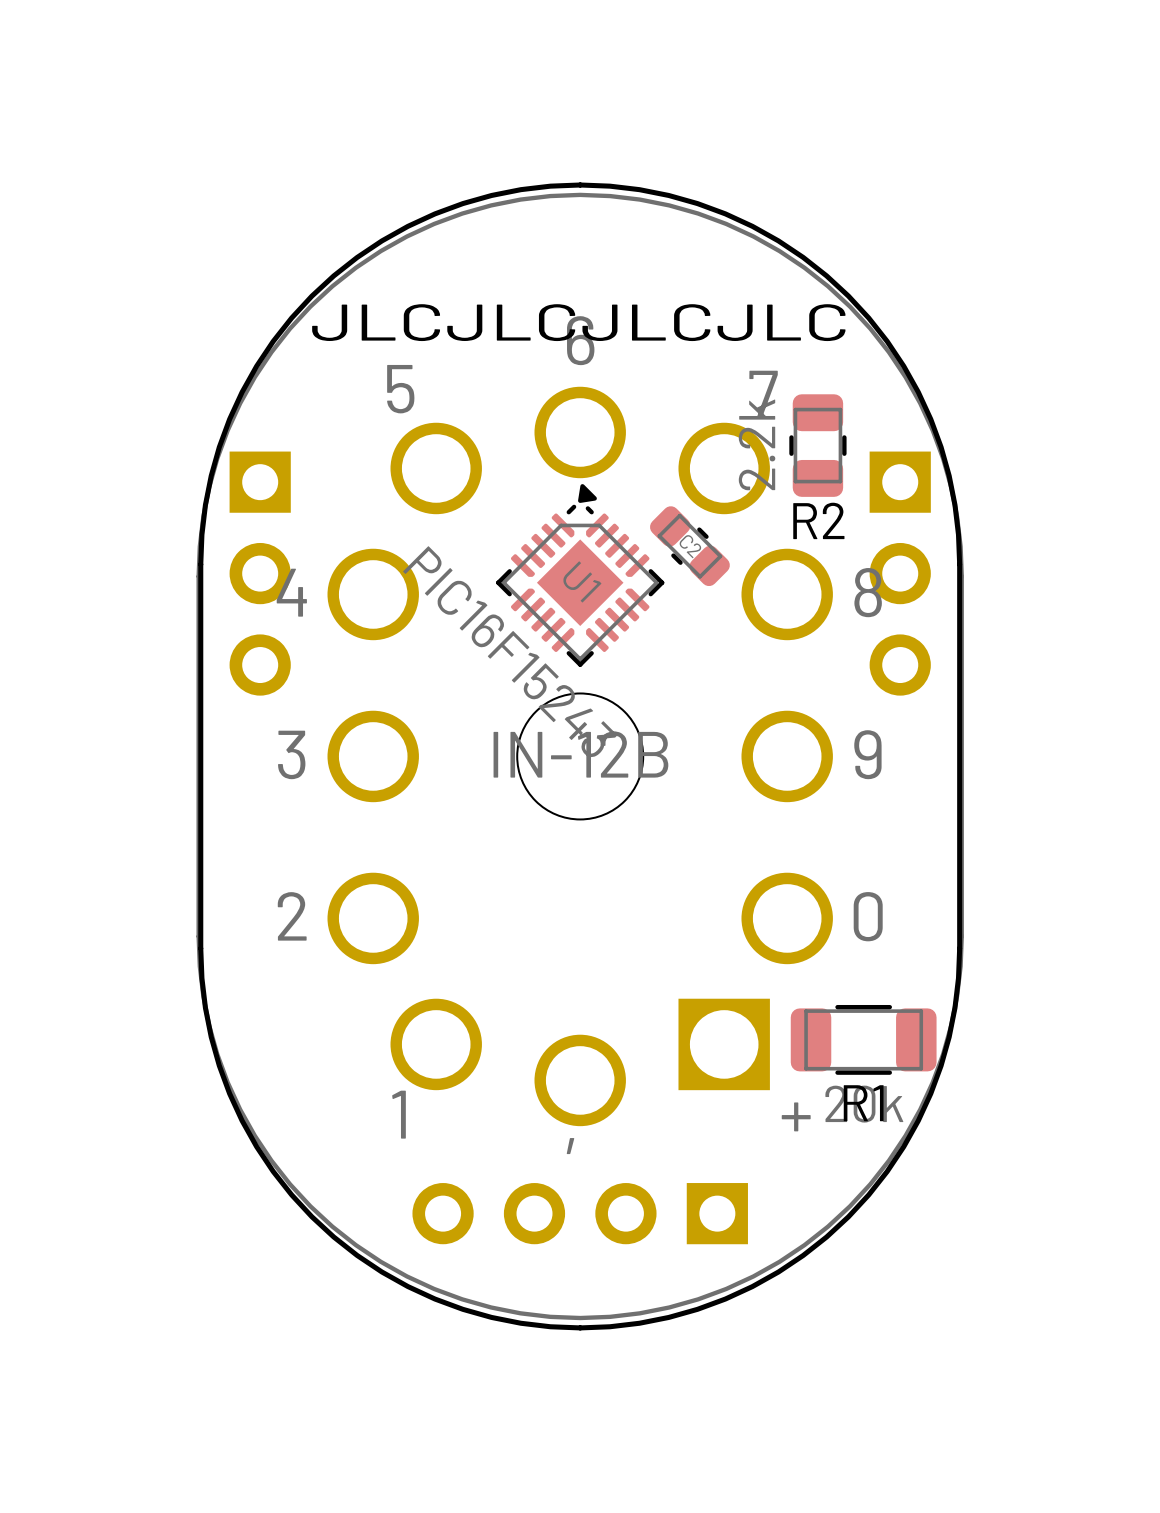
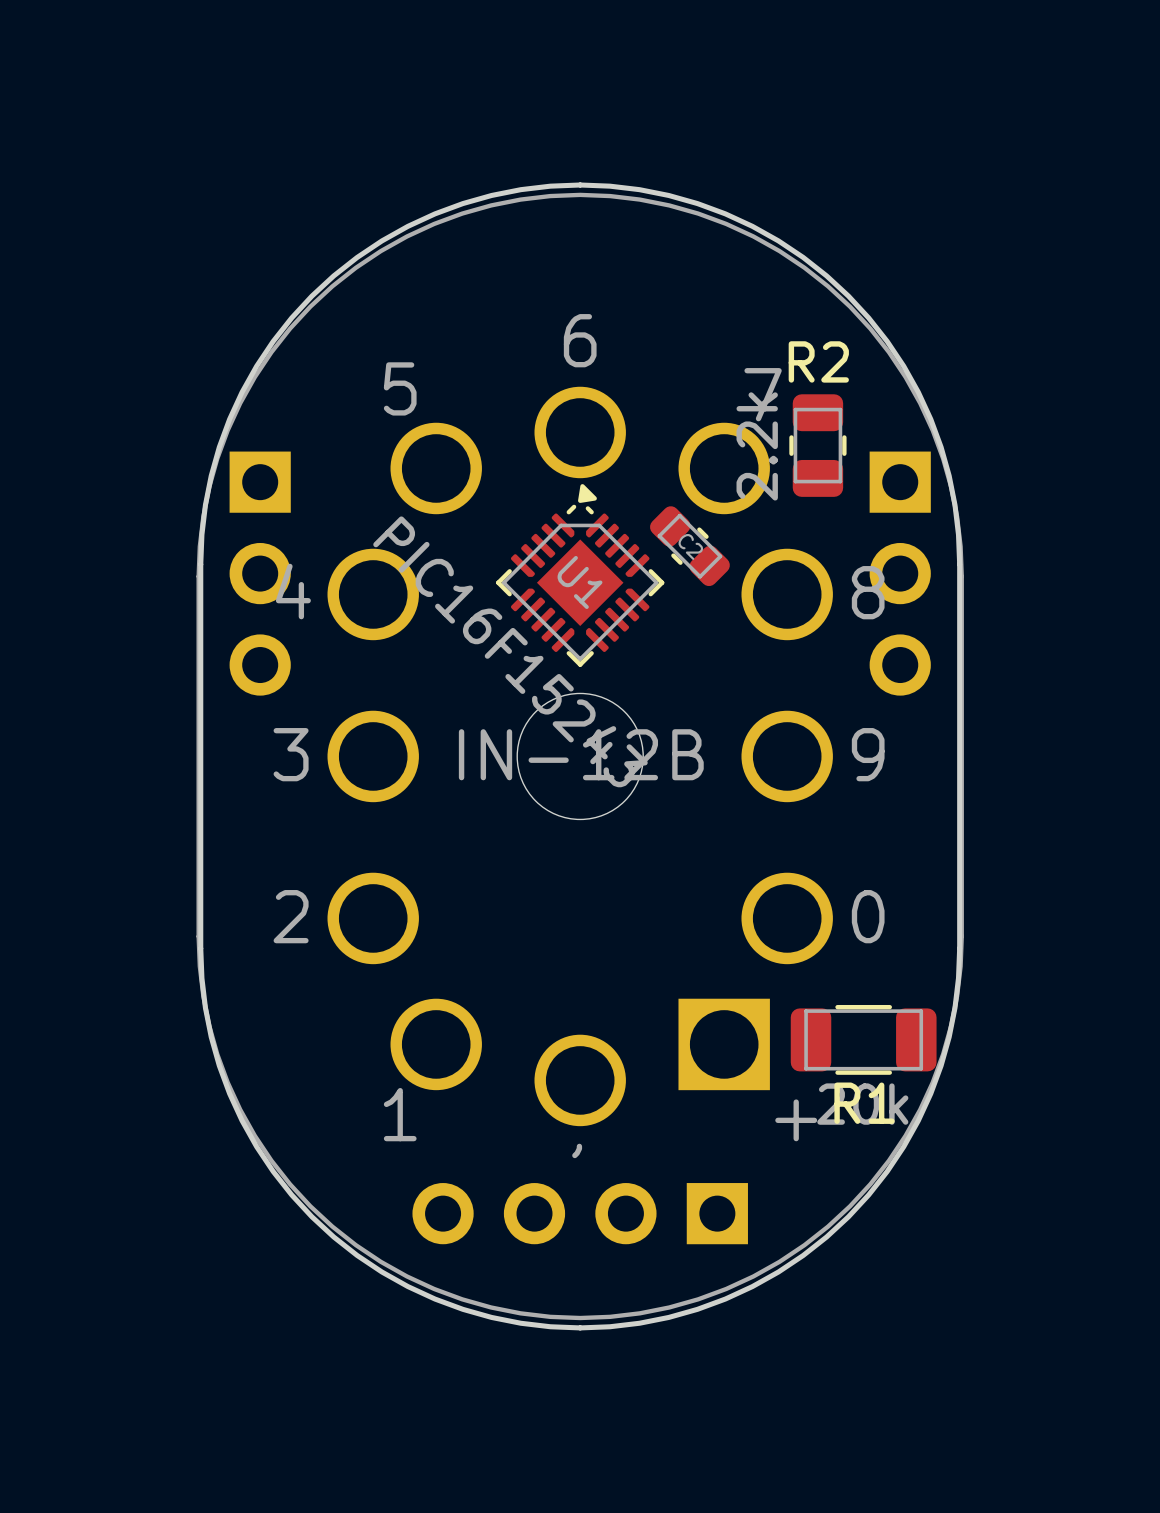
text: JLCJLCJLCJLC (578, 322) -> none
R2 name position: R2 (818, 520) -> R2 (818, 361)

